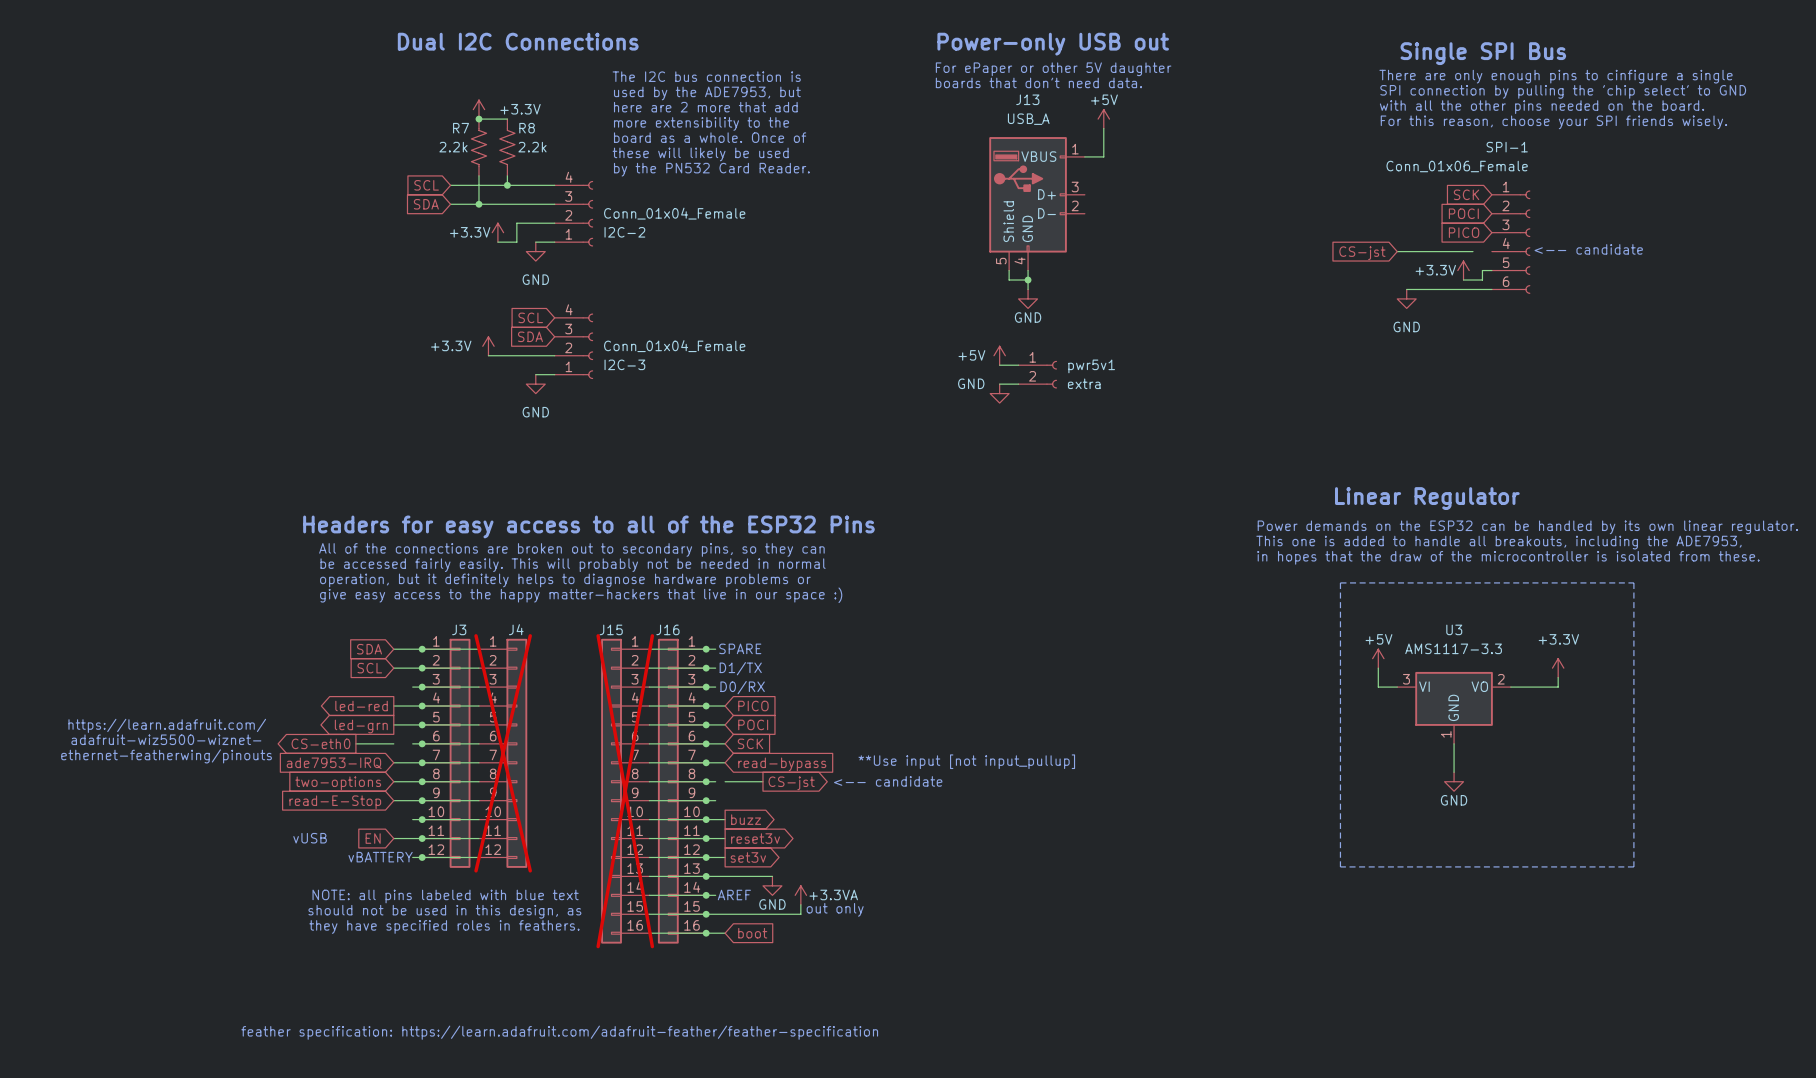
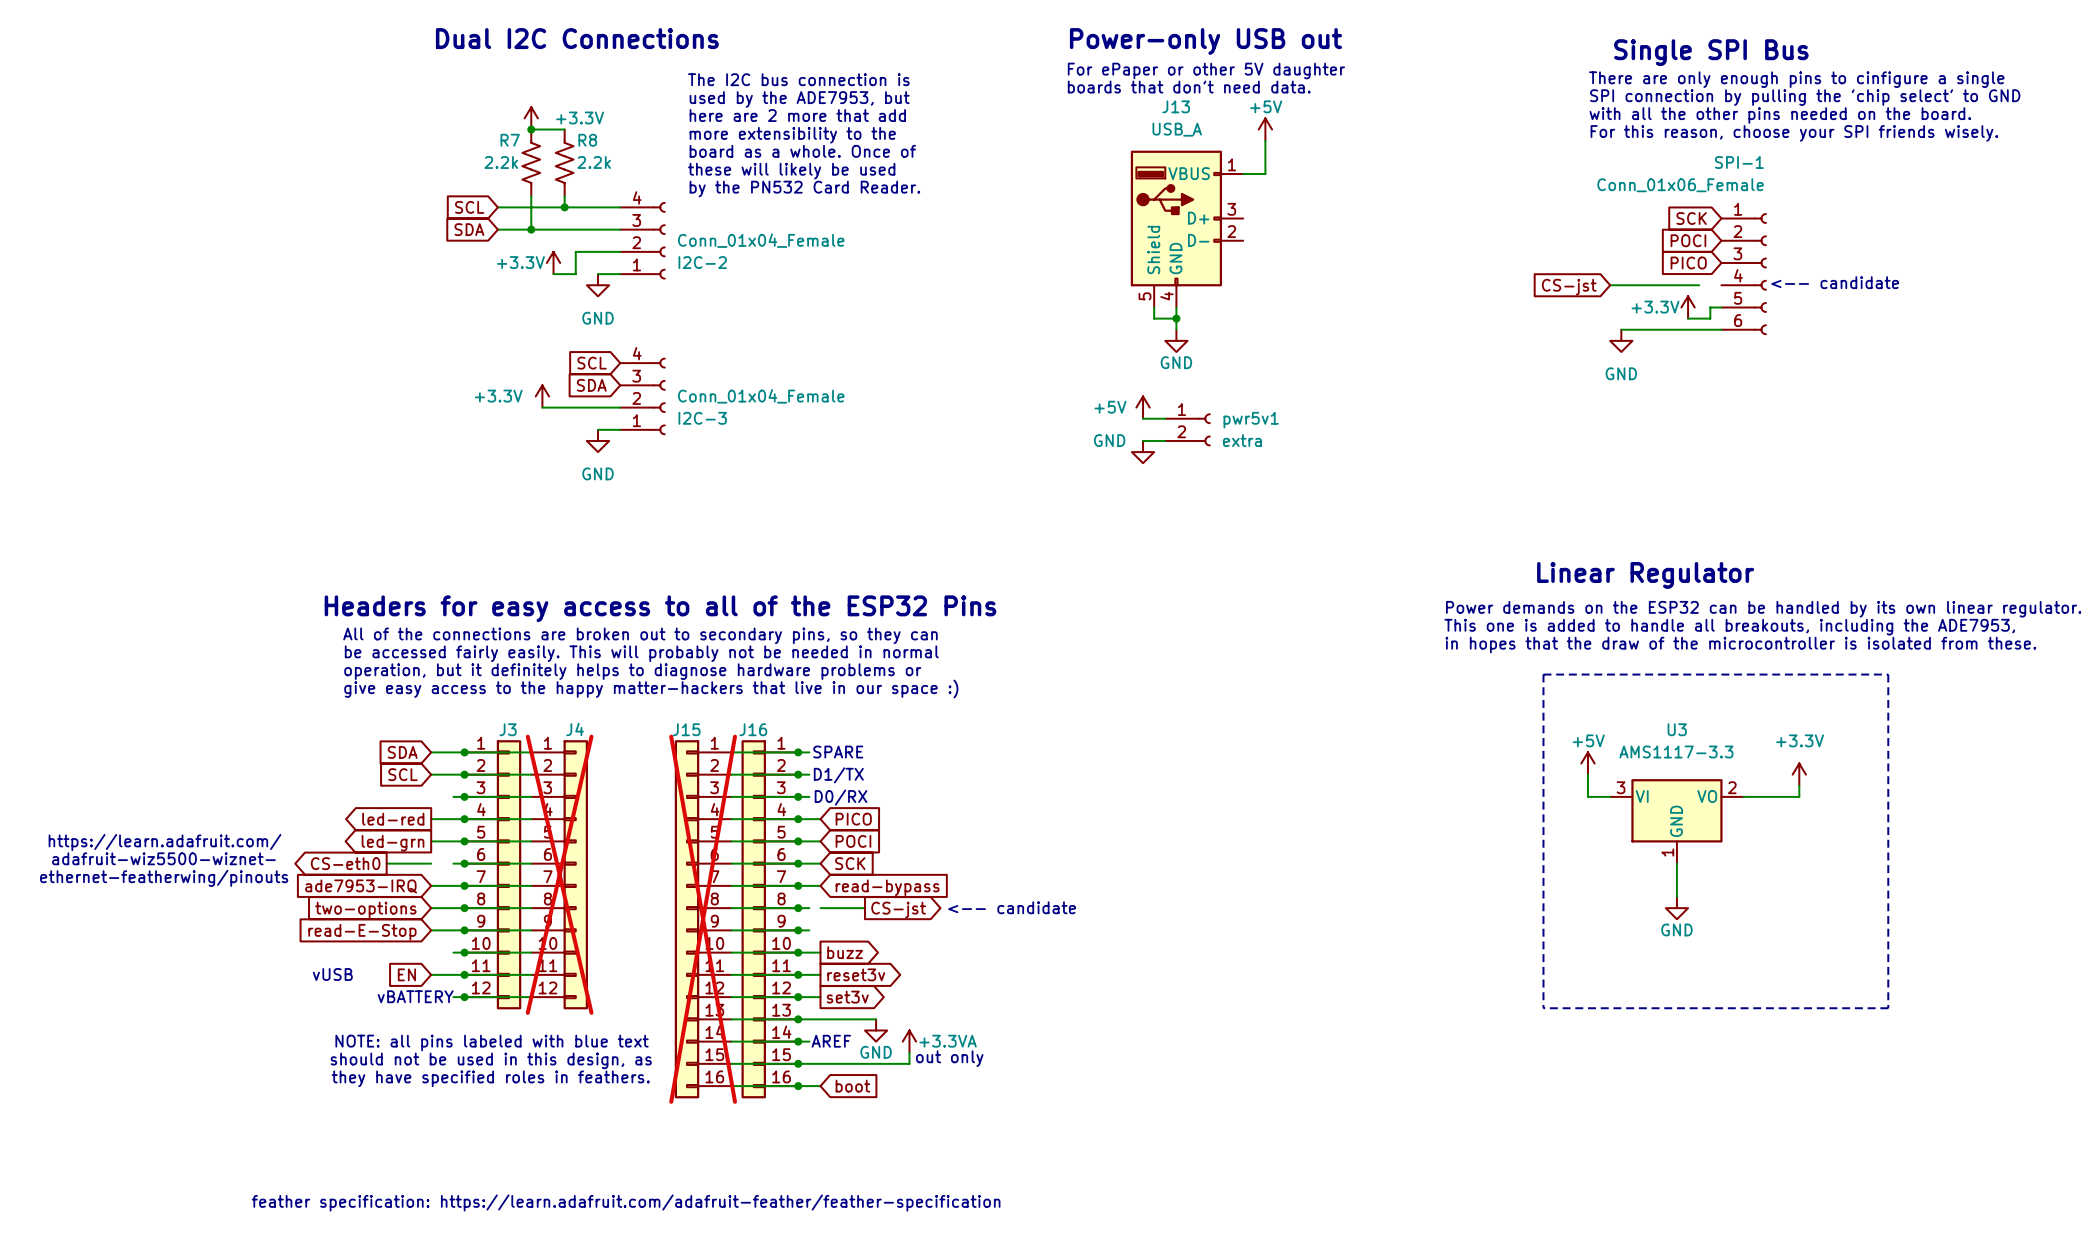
text: **Use input [not input_pullup] (966, 761) -> none

